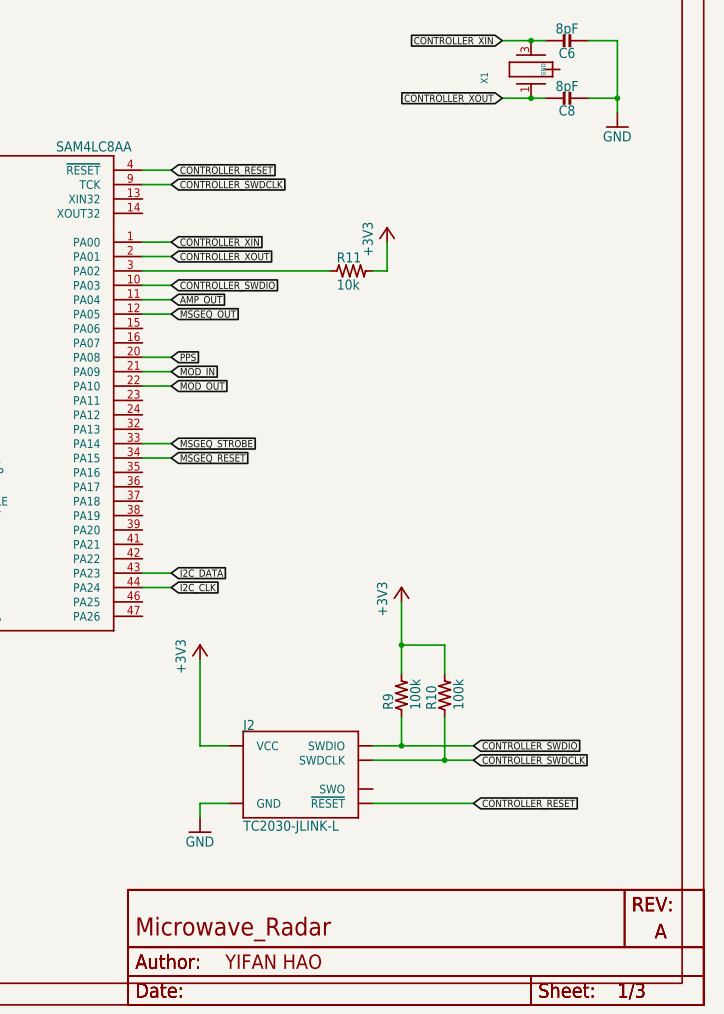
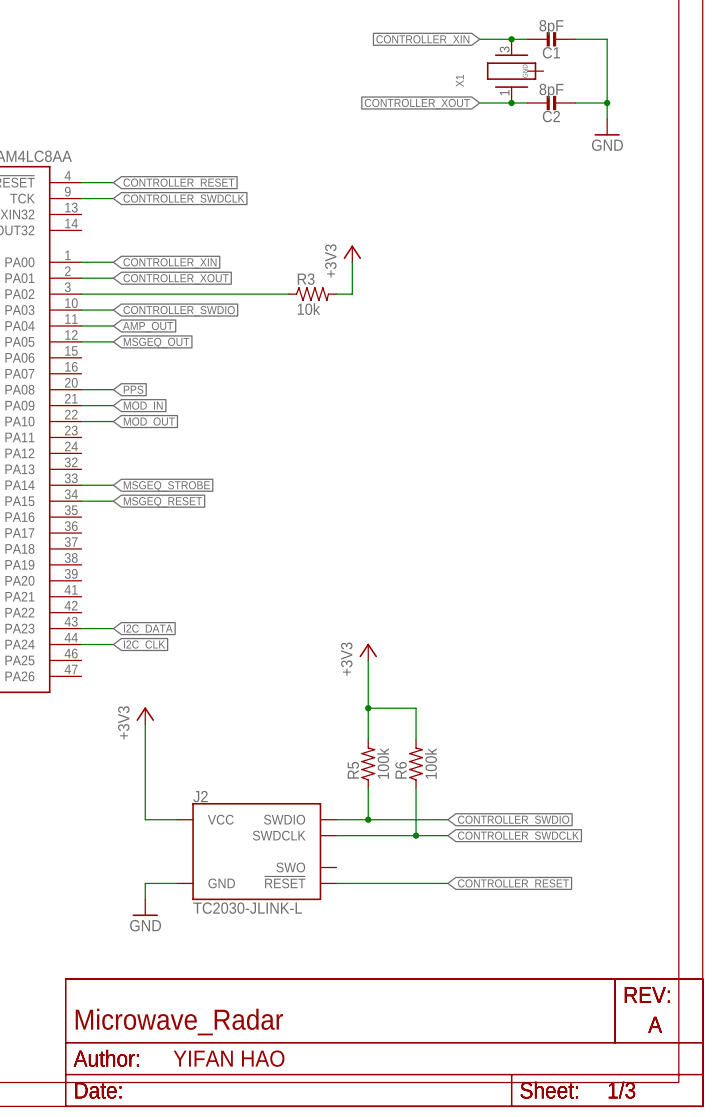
C6 name: C6 (566, 52) -> C1 (551, 52)
C8 name: C8 (566, 110) -> C2 (551, 116)
R11 name: R11 (349, 257) -> R3 (306, 279)
R10 name: R10 (431, 697) -> R6 (401, 770)
R9 name: R9 (387, 701) -> R5 (353, 770)

